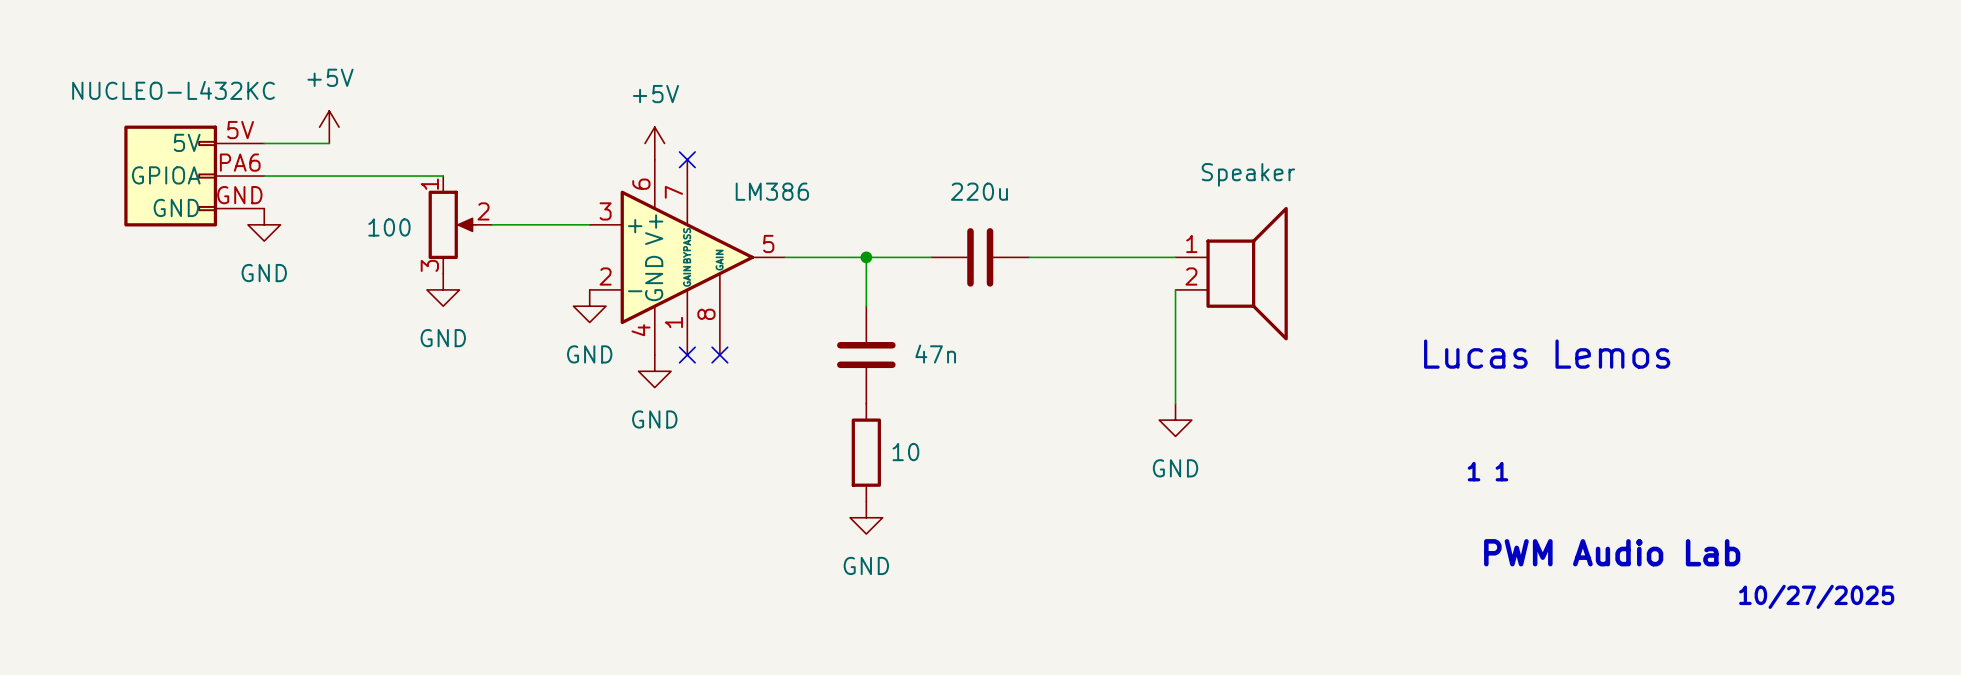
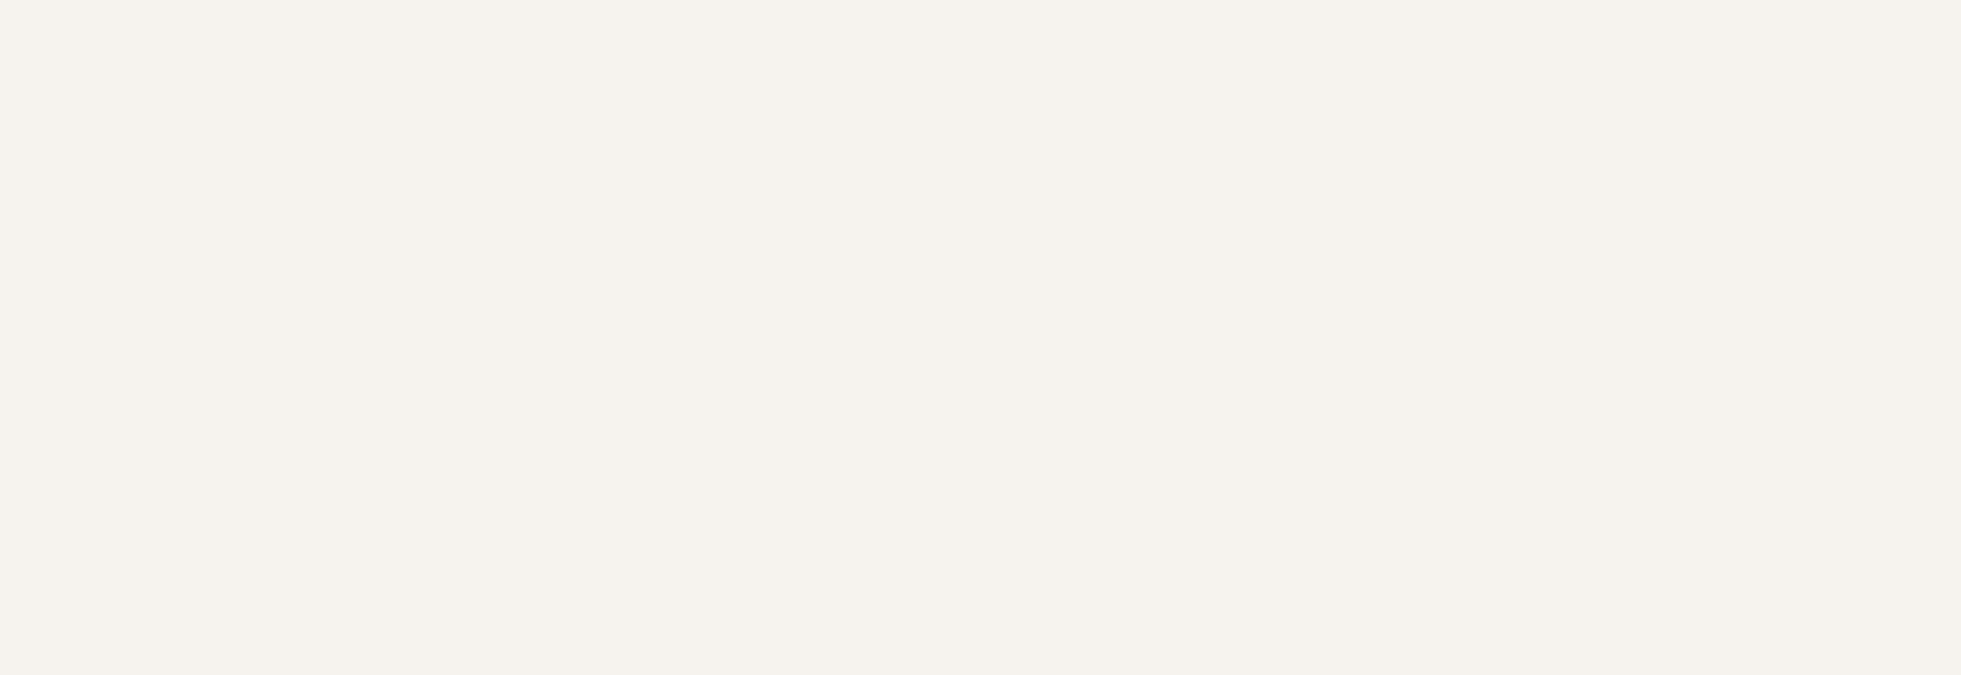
power symbol: +5V (329, 127) -> none
wire: (264, 143) (329, 143) -> none
power symbol: +5V (654, 143) -> none
no-connect mark: (687, 159) -> none
part: NUCLEO-L432KC (194, 176) -> none
wire: (264, 176) (443, 176) -> none
power symbol: GND (264, 224) -> none
part: 100 (460, 224) -> none
wire: (492, 224) (589, 224) -> none
part: LM386 (687, 257) -> none
wire: (784, 257) (931, 257) -> none
wire: (866, 257) (866, 306) -> none
junction: (866, 257) -> none
part: 220u (980, 257) -> none
wire: (1029, 257) (1175, 257) -> none
part: Speaker (1231, 273) -> none
power symbol: GND (443, 289) -> none
wire: (1175, 289) (1175, 403) -> none
power symbol: GND (589, 306) -> none
text: Lucas Lemos (1547, 354) -> none
no-connect mark: (687, 355) -> none
no-connect mark: (719, 355) -> none
part: 47n (866, 355) -> none
power symbol: GND (654, 371) -> none
power symbol: GND (1175, 420) -> none
part: 10 (866, 452) -> none
text: 1 1 (1487, 471) -> none
power symbol: GND (866, 517) -> none
text: PWM Audio Lab (1612, 552) -> none
text: 10/27/2025 (1816, 596) -> none

